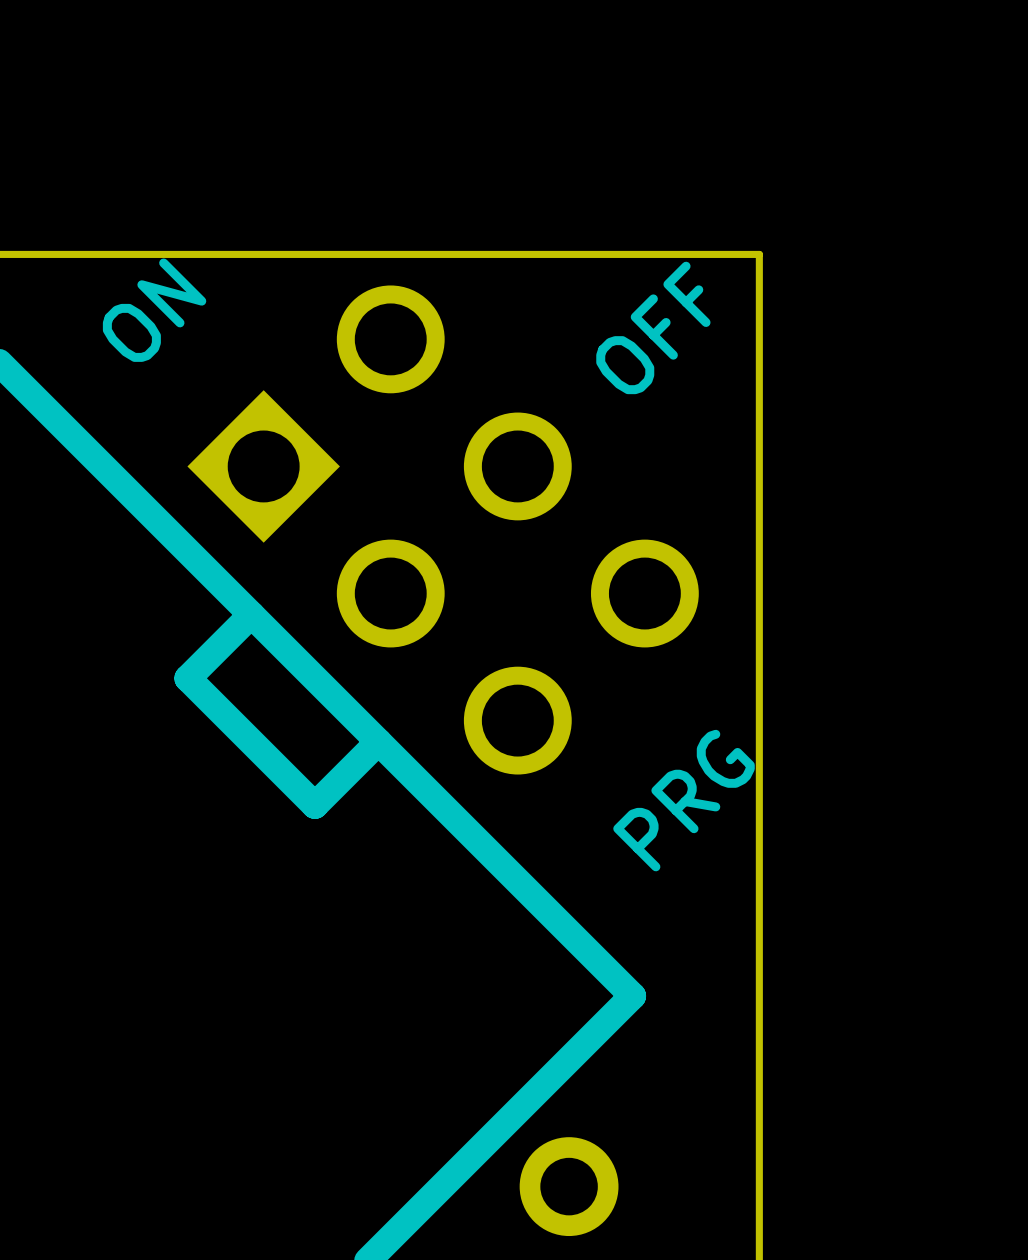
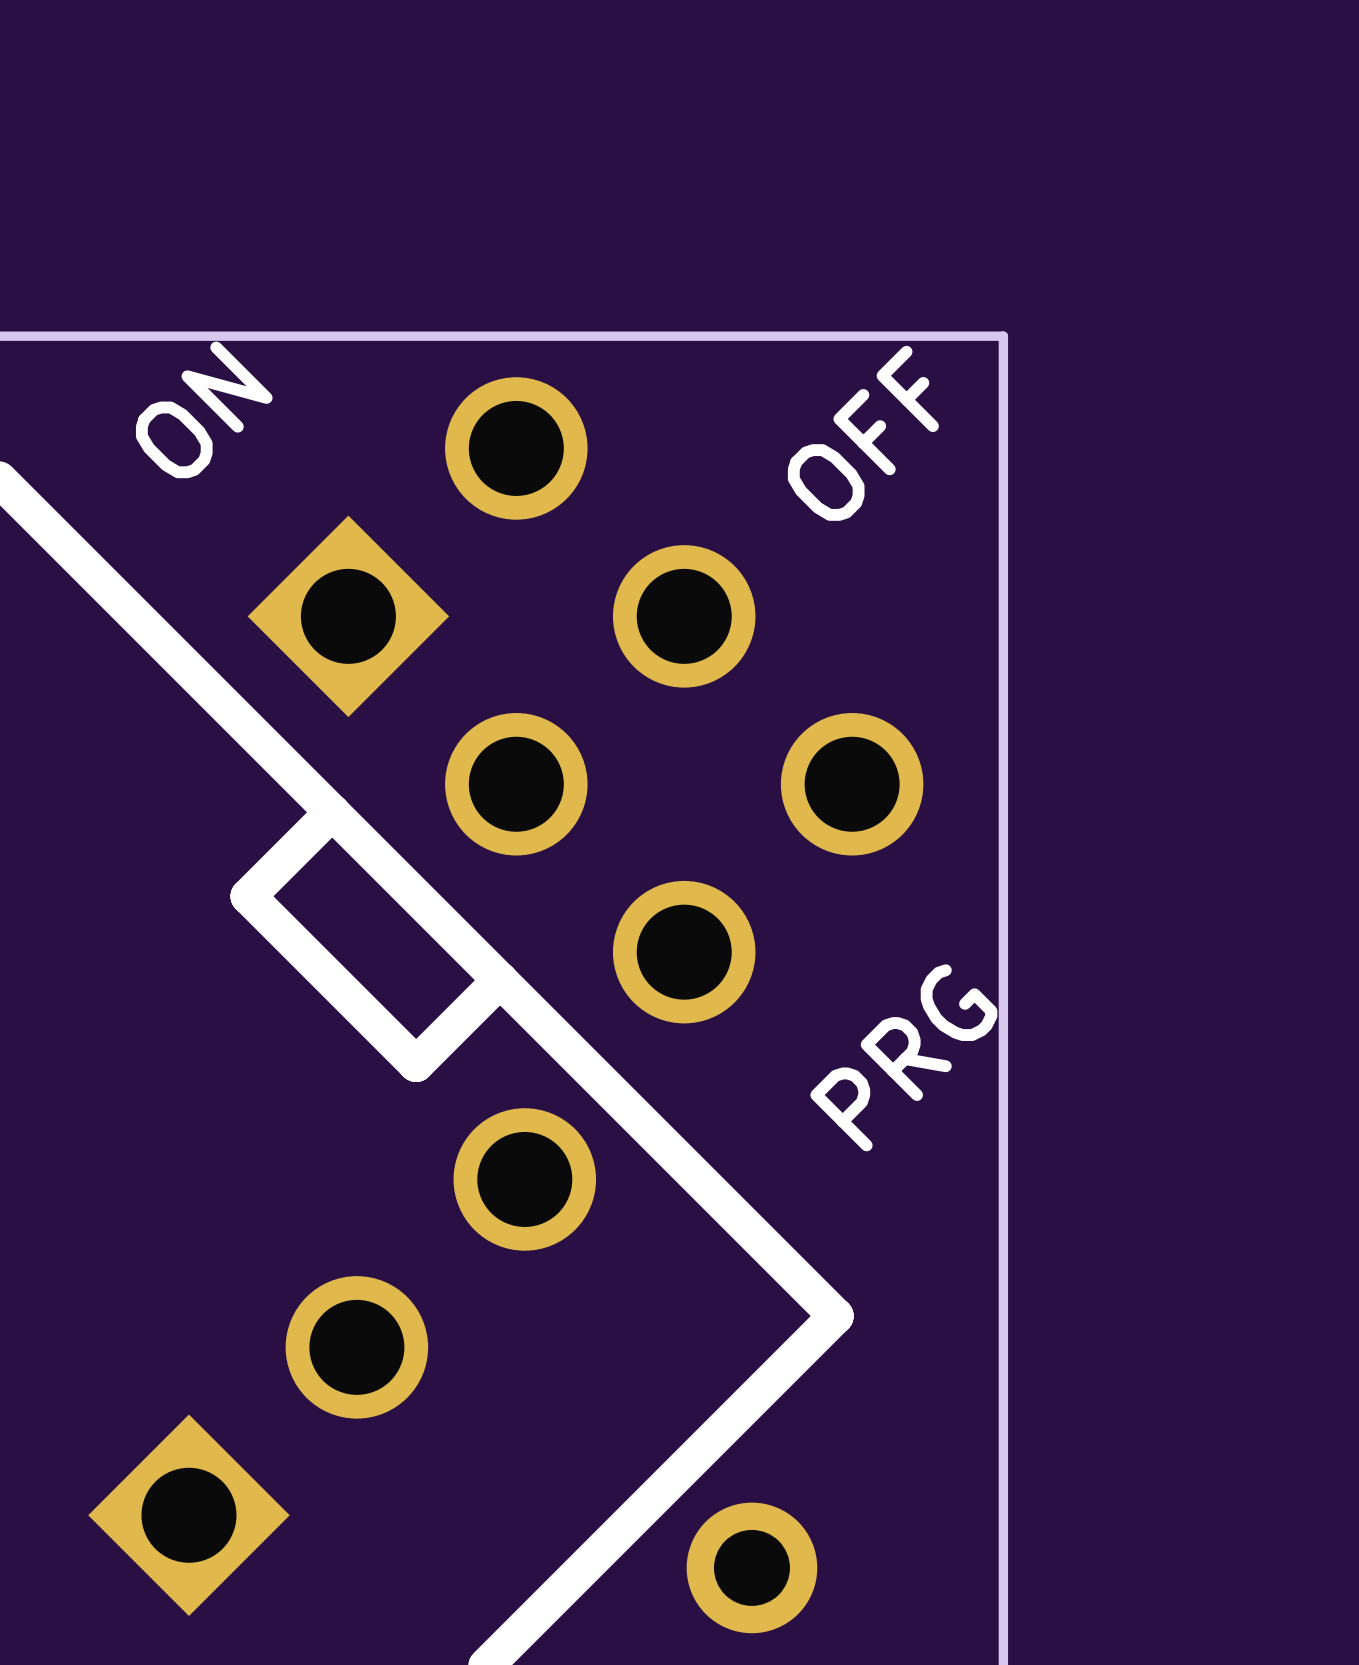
part: none -> (342, 1362)

